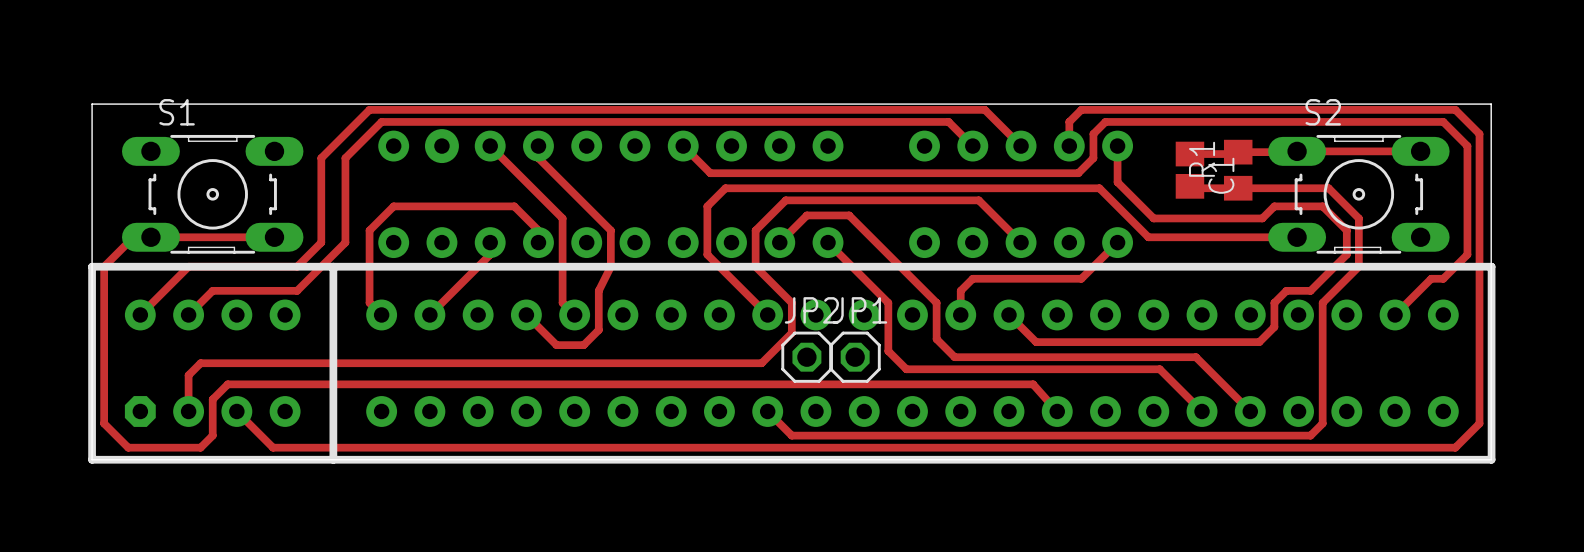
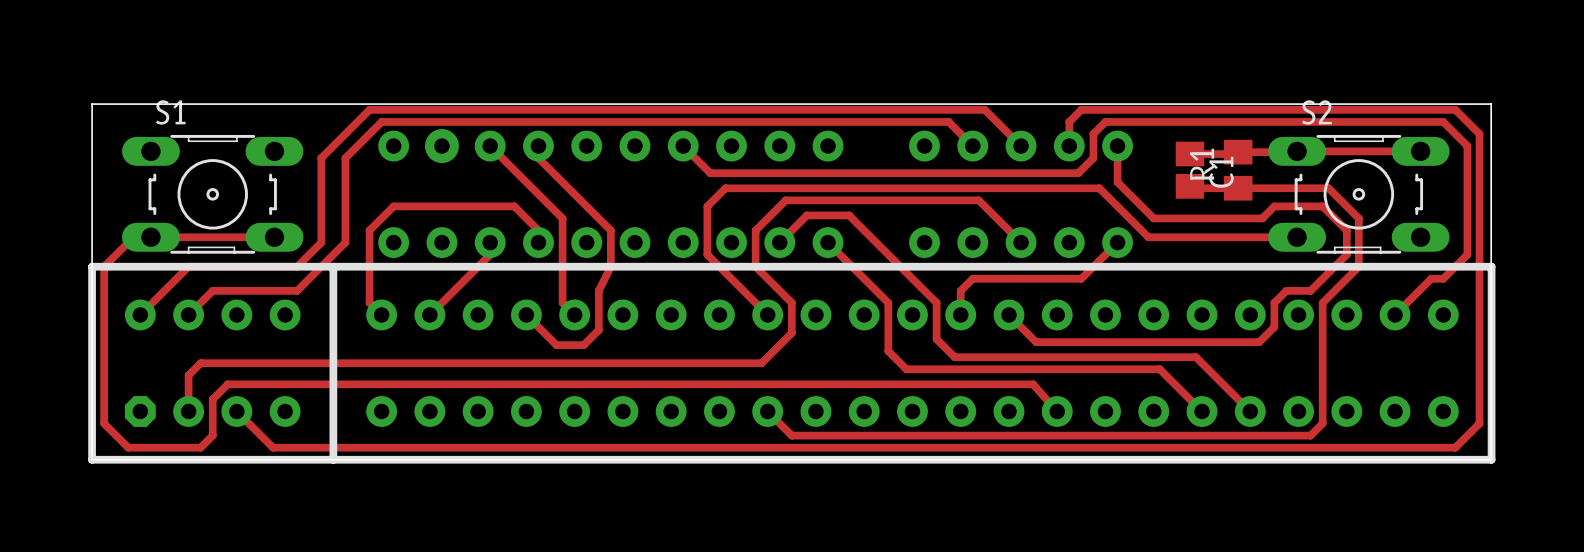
JP2: (806, 357) -> none
JP1: (855, 357) -> none

